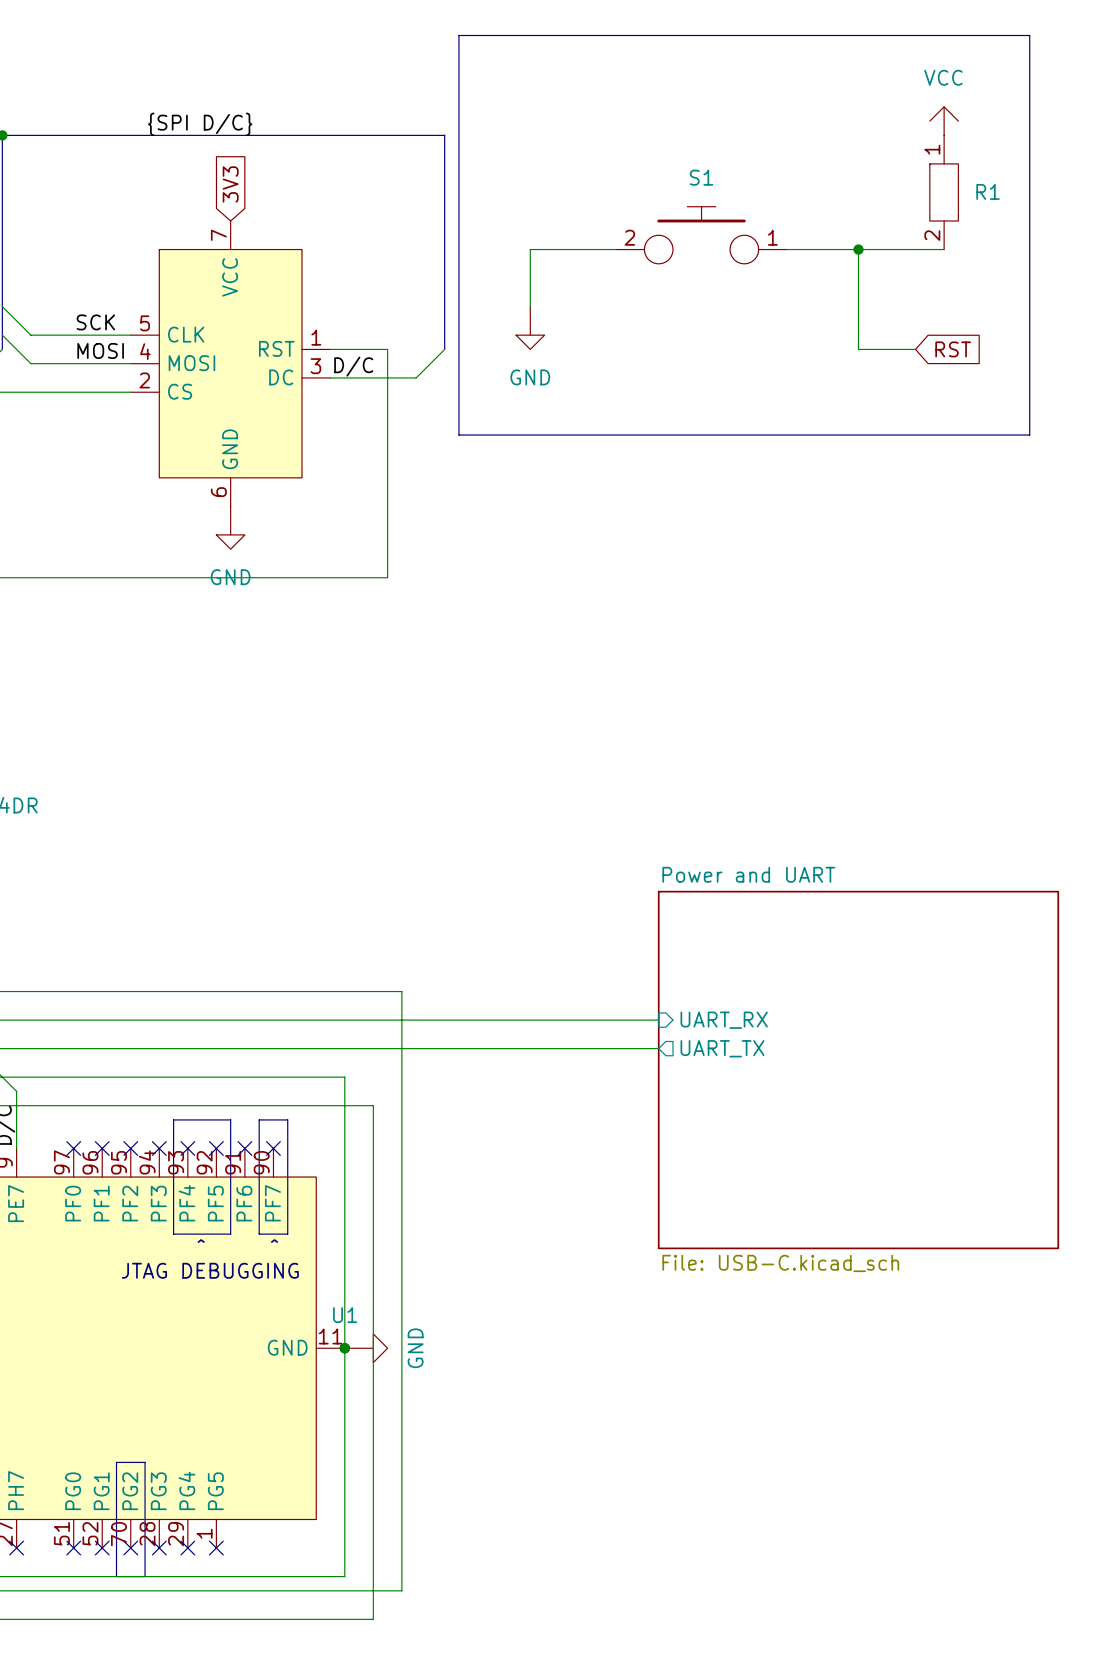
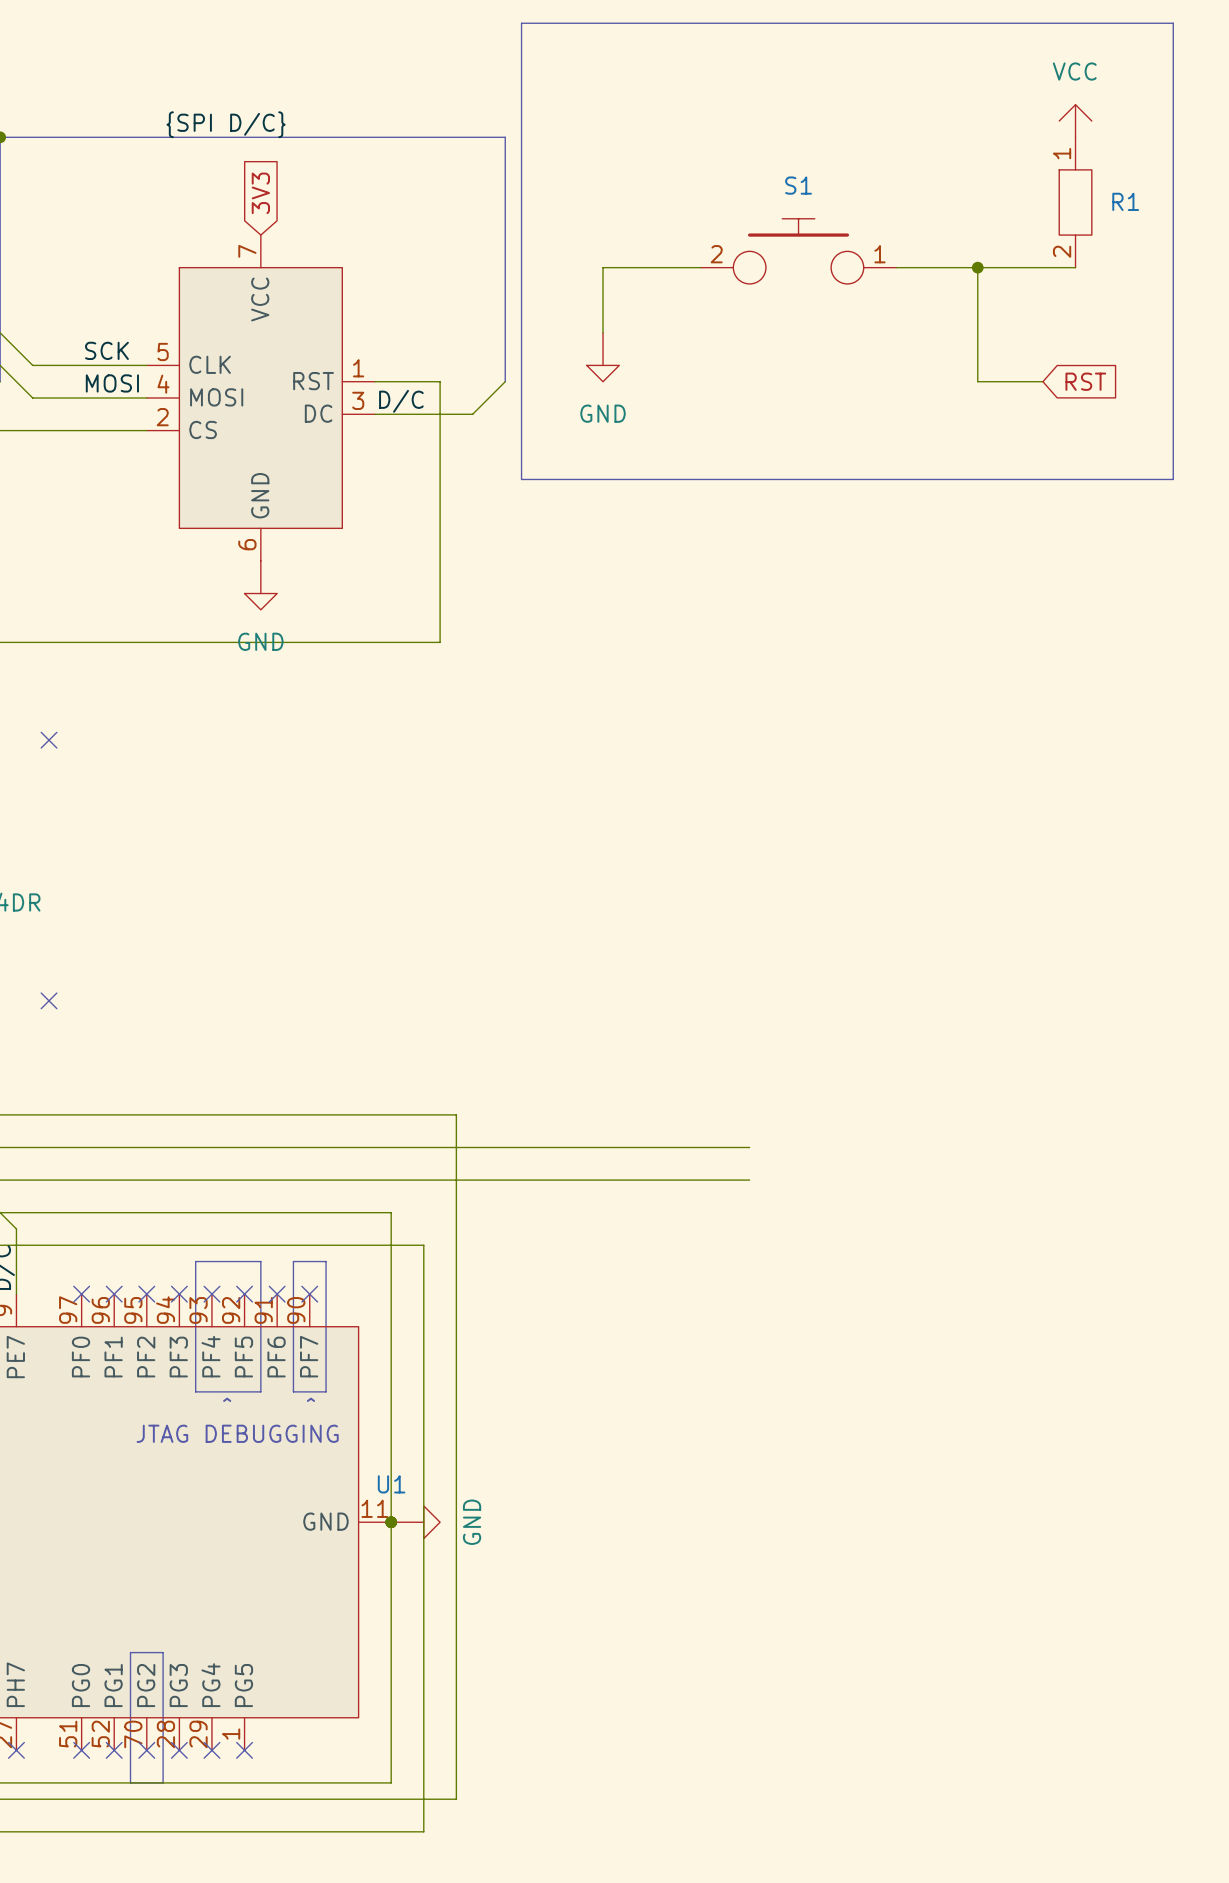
no-connect mark: none -> (49, 740)
no-connect mark: none -> (49, 1000)
sheet pin: UART_RX (724, 1020) -> none
sheet pin: UART_TX (722, 1048) -> none
sheet Power and UART: File: USB-C.kicad_sch (858, 1070) -> none

